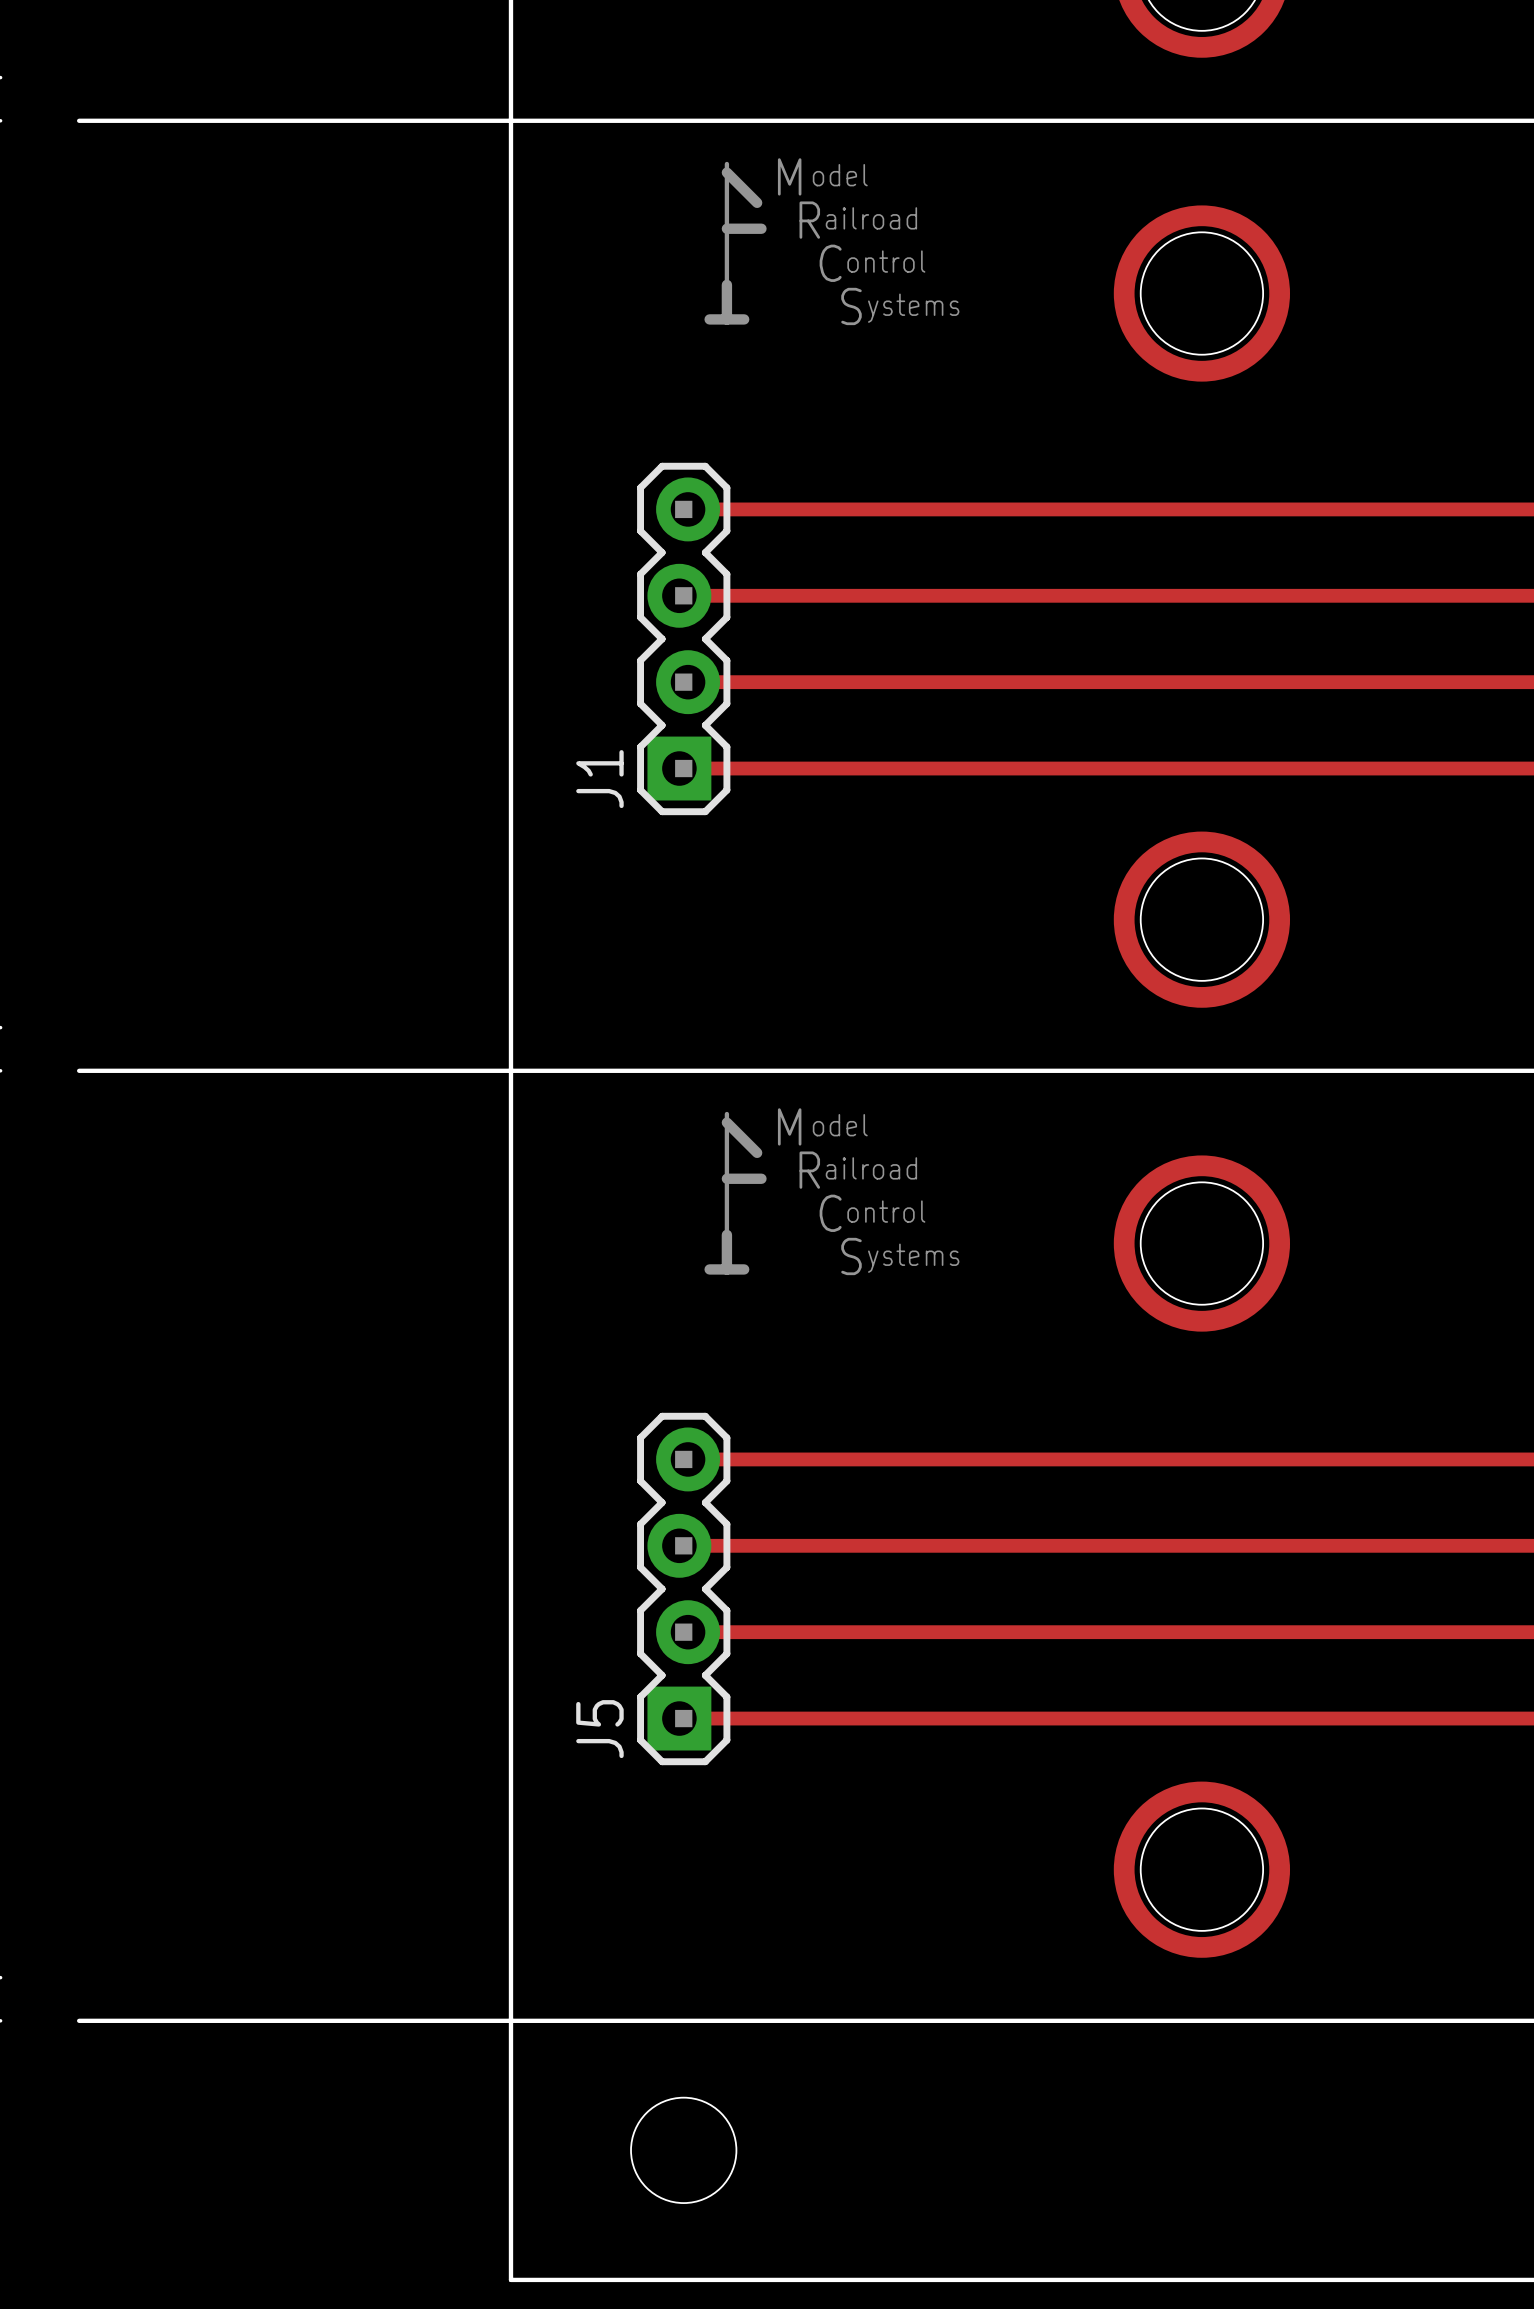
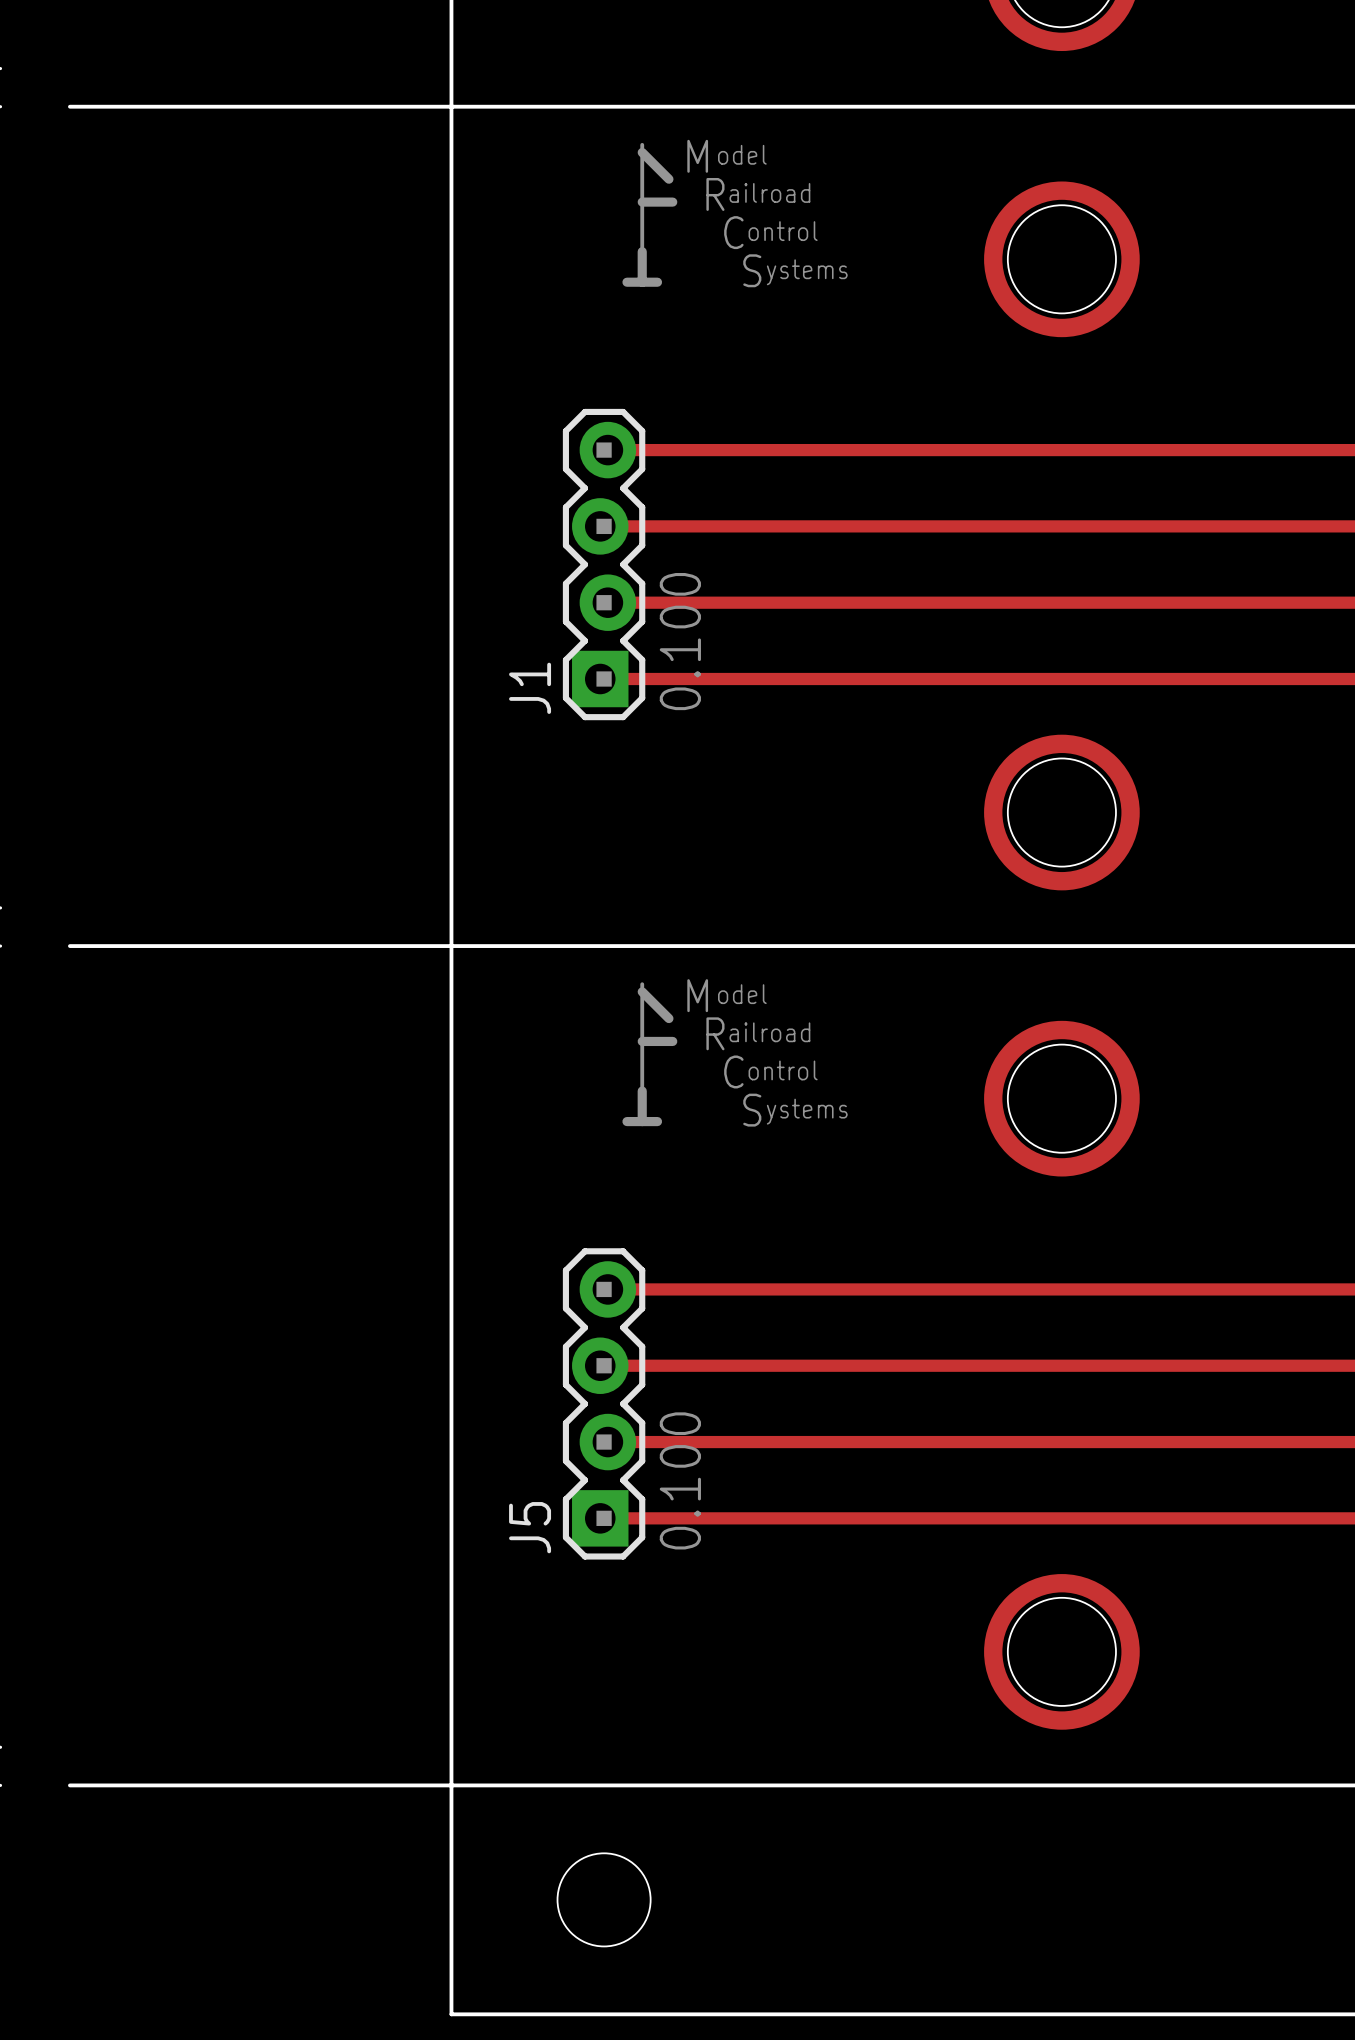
J1 value: none -> 0.100 (680, 641)
J5 value: none -> 0.100 (680, 1480)

